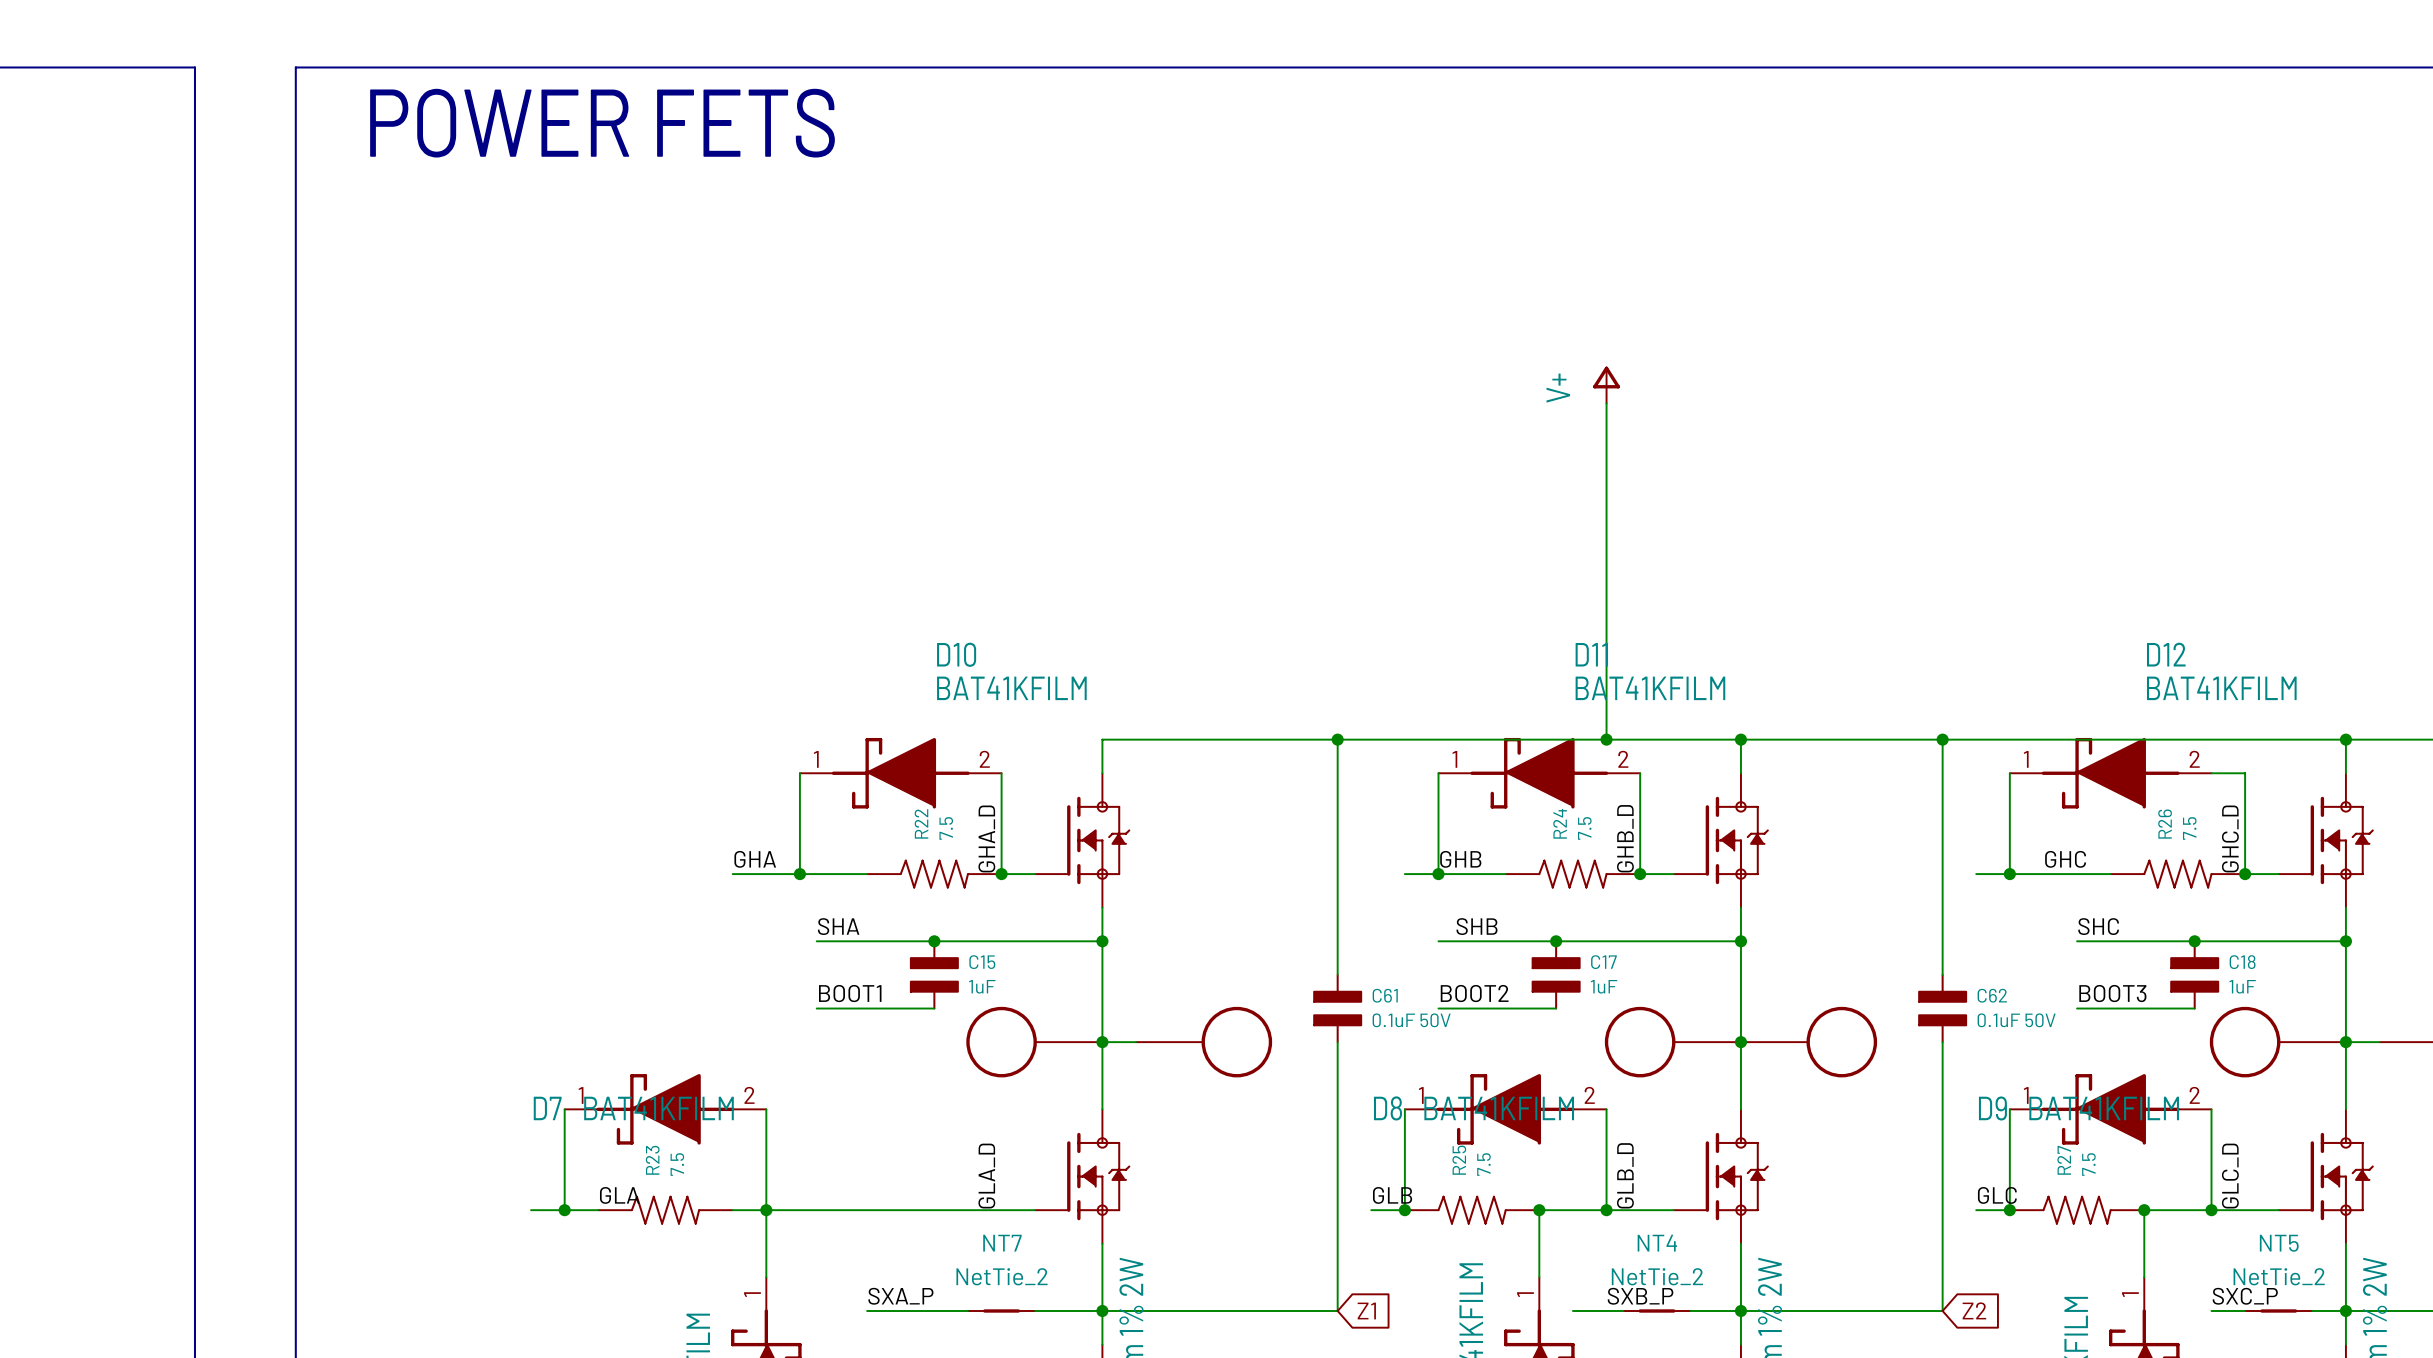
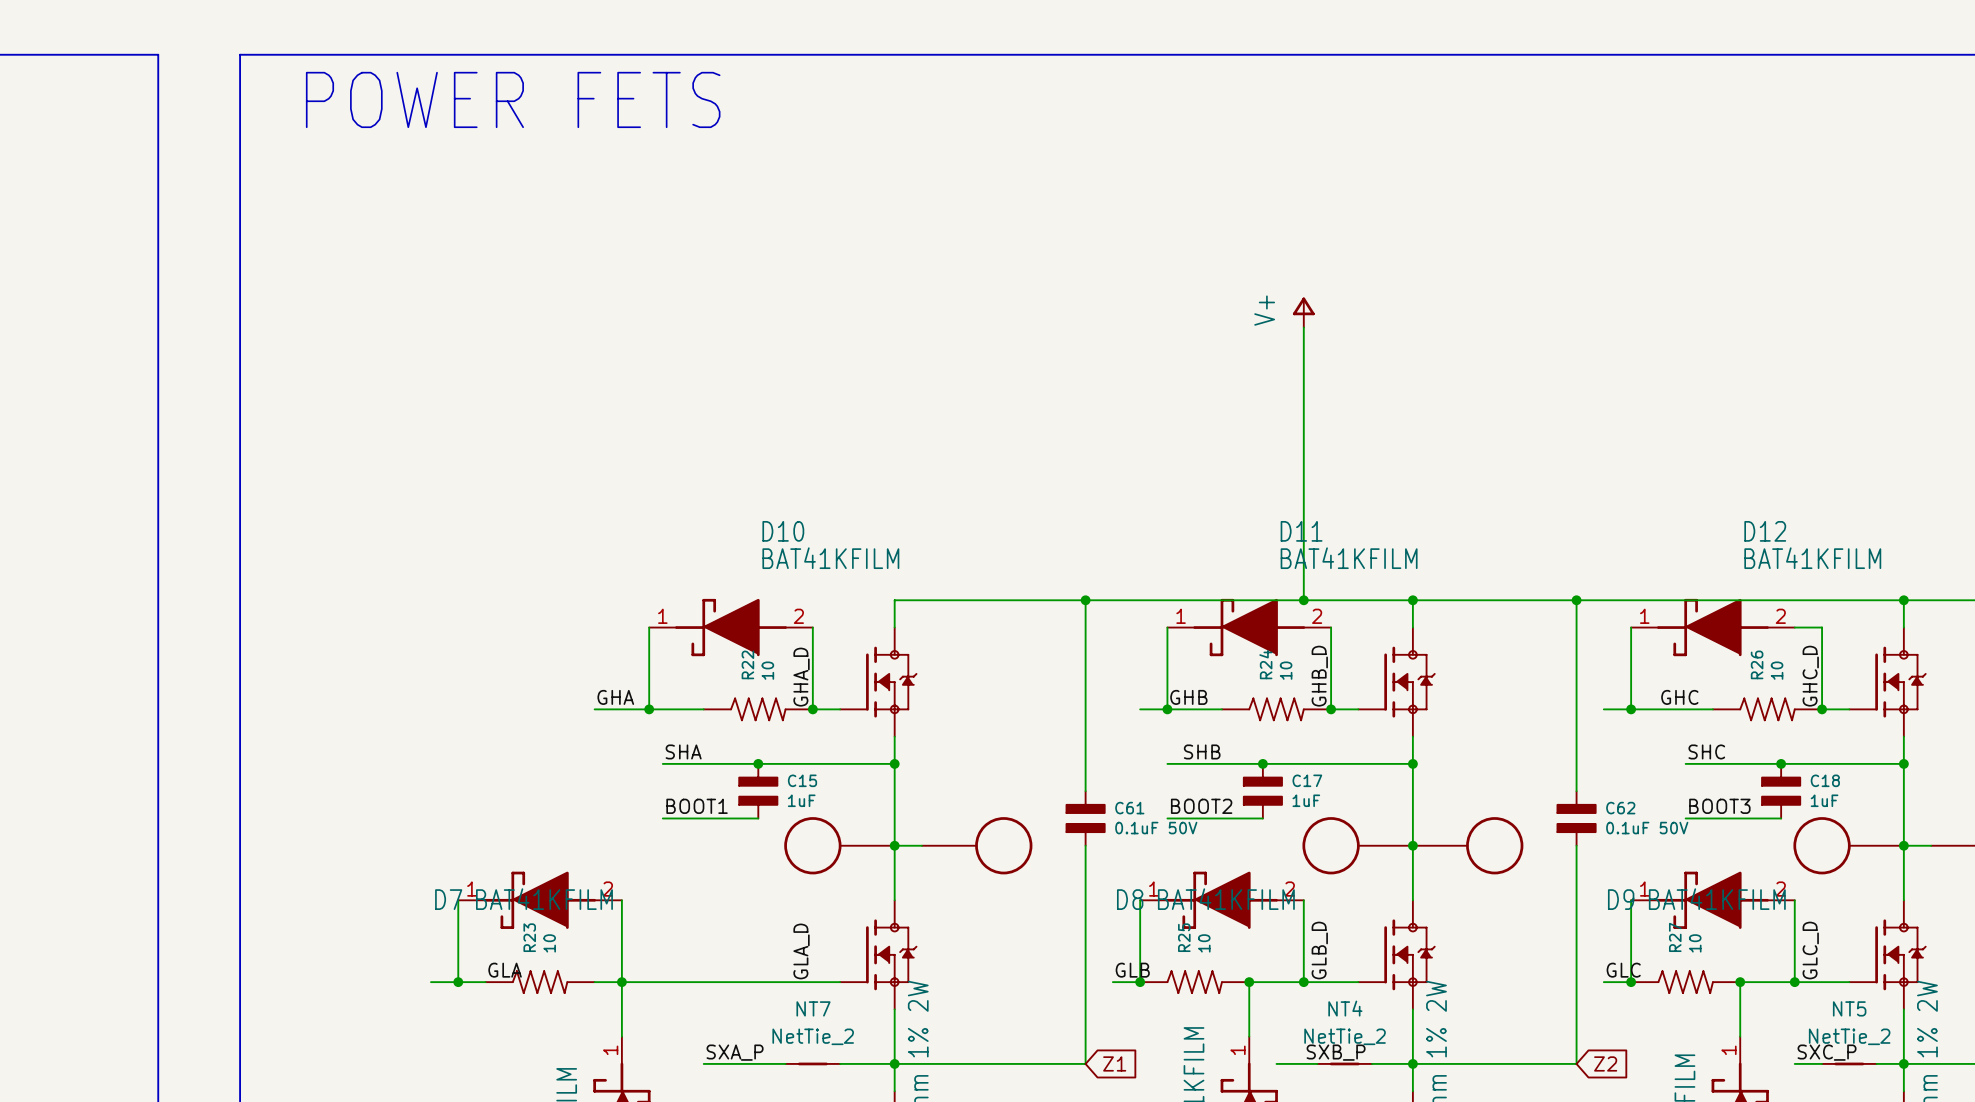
R22 value: 7.5 (946, 828) -> 10 (767, 670)
R24 value: 7.5 (1584, 828) -> 10 (1286, 670)
R26 value: 7.5 (2189, 828) -> 10 (1777, 670)
R23 value: 7.5 (677, 1164) -> 10 (549, 943)
R25 value: 7.5 (1483, 1164) -> 10 (1204, 943)
R27 value: 7.5 (2088, 1164) -> 10 (1695, 943)

